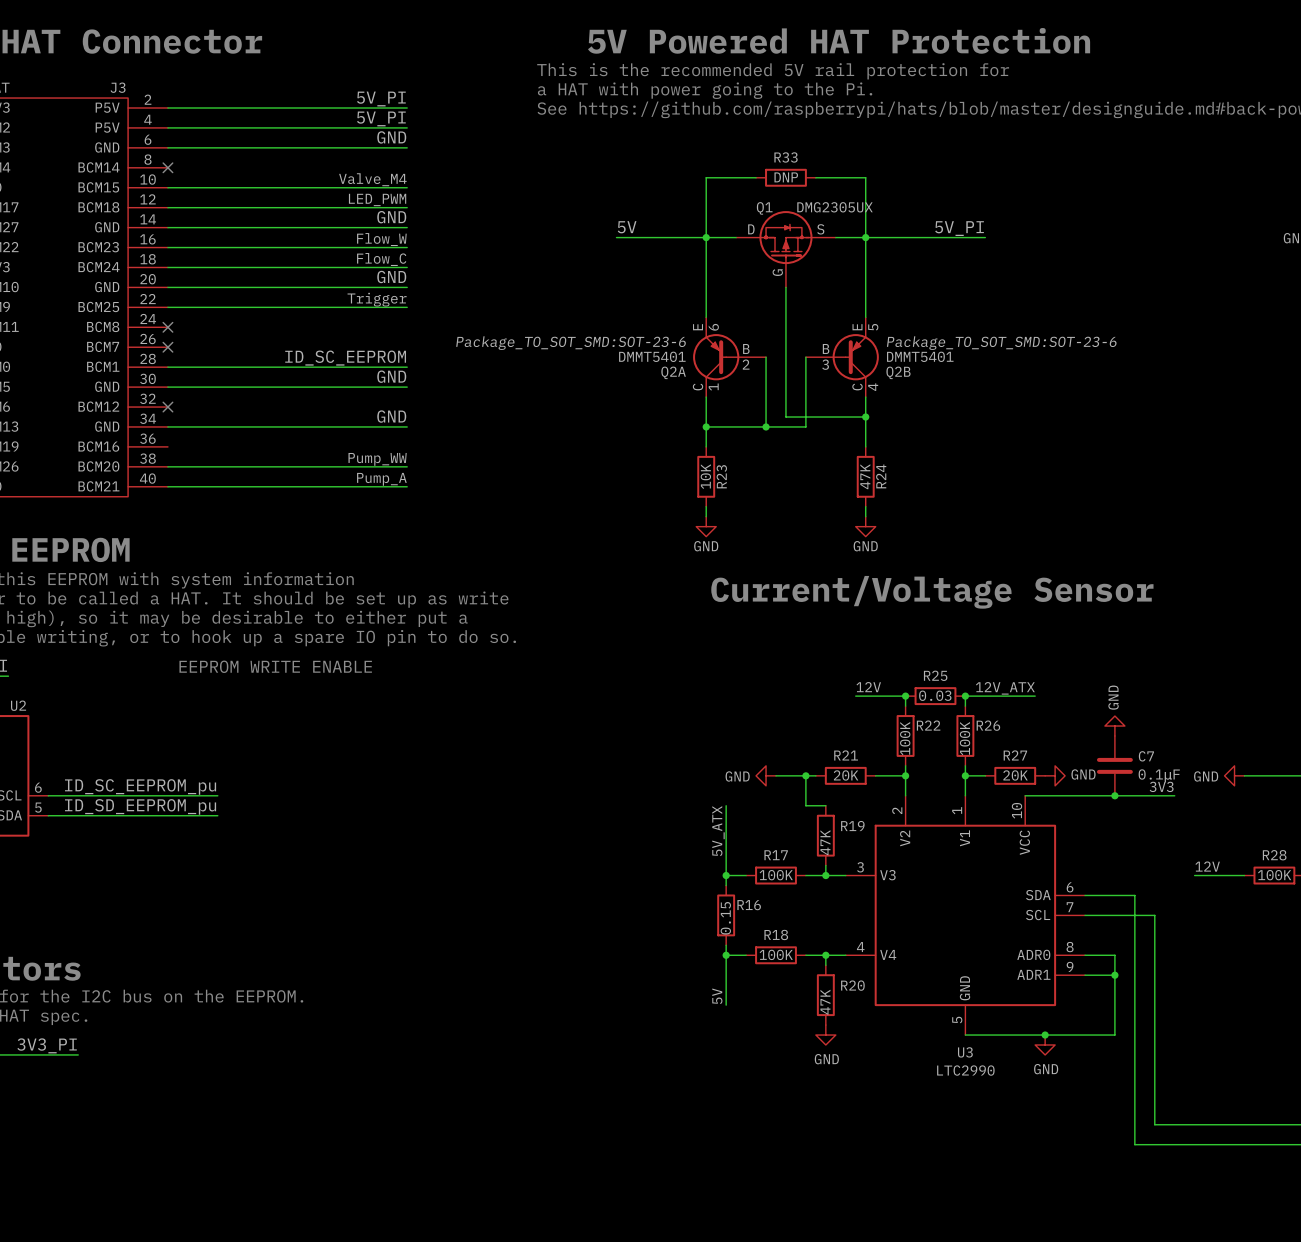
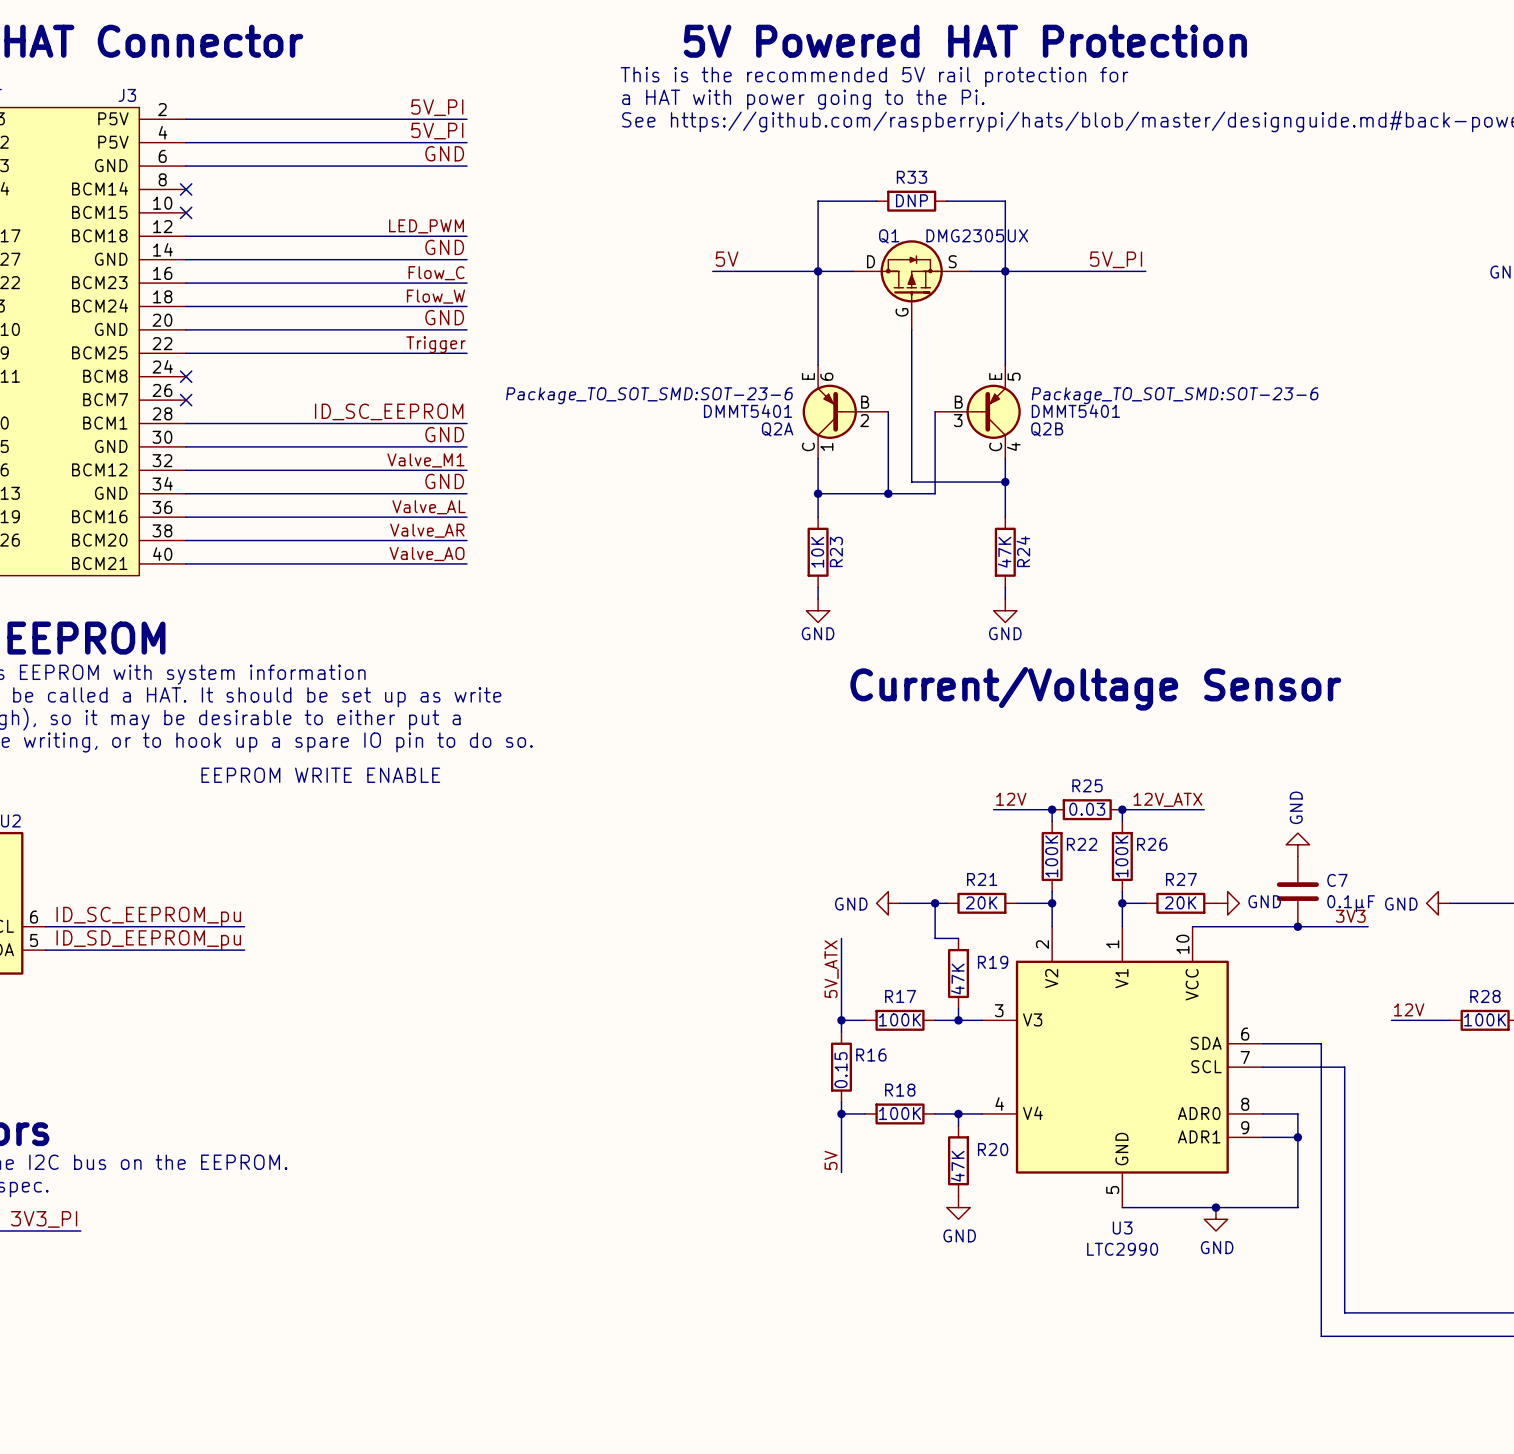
label: Valve_M4 (372, 179) -> none
wire: (167, 187) (407, 187) -> none
no-connect mark: none -> (186, 212)
label: Flow_W (381, 239) -> Flow_C (436, 273)
label: Flow_C (381, 259) -> Flow_W (435, 296)
label: none -> Valve_M1 (425, 460)
wire: none -> (186, 470) (467, 470)
no-connect mark: (167, 407) -> none
label: none -> Valve_AL (429, 507)
wire: none -> (186, 517) (467, 517)
label: Pump_WW (377, 459) -> Valve_AR (427, 530)
label: Pump_A (381, 479) -> Valve_AO (427, 554)

